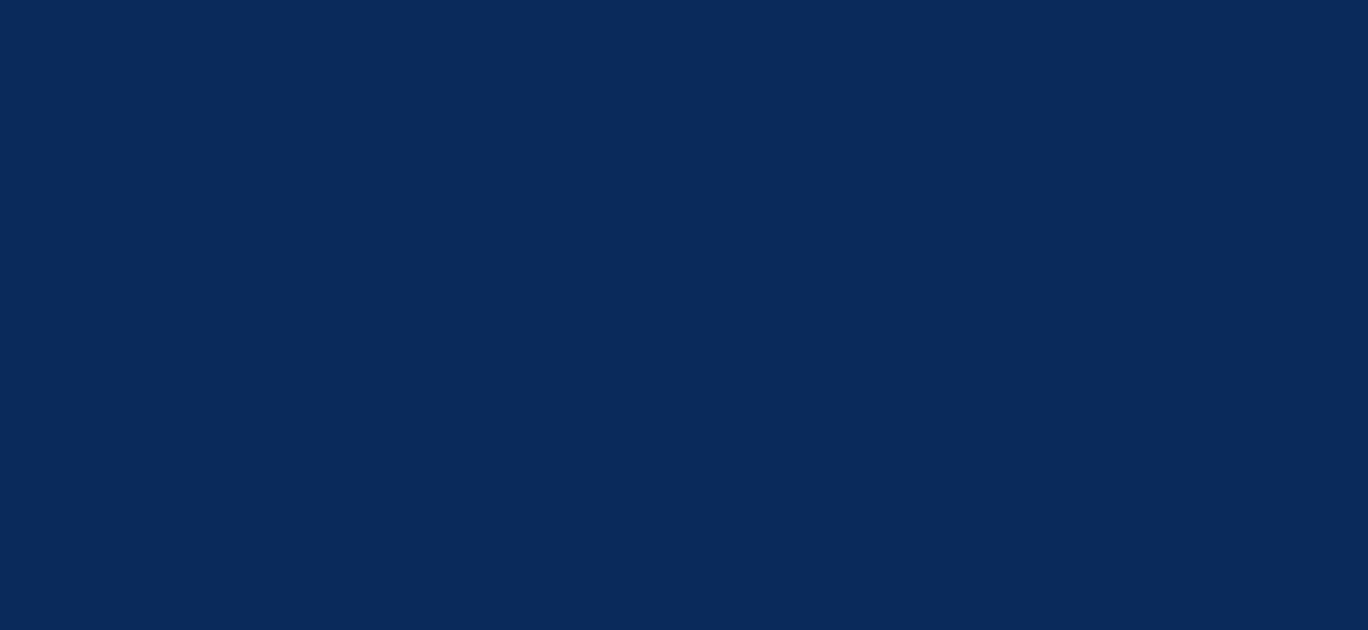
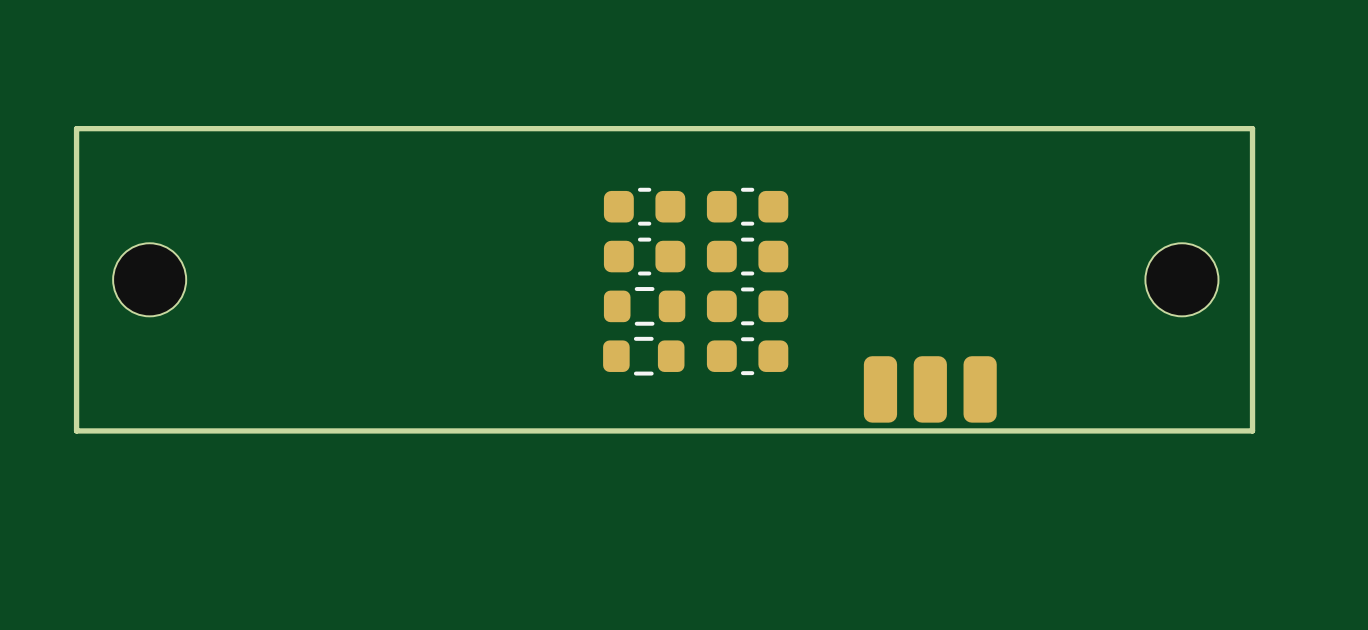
board edge: none -> (1252, 128) (76, 128) (76, 430) (1252, 430) (1252, 128)
part: none -> (644, 206)
part: none -> (747, 206)
part: none -> (644, 256)
part: none -> (747, 256)
part: none -> (149, 279)
part: none -> (1181, 279)
part: none -> (644, 306)
part: none -> (747, 306)
part: none -> (643, 356)
part: none -> (747, 356)
part: none -> (880, 389)
part: none -> (930, 389)
part: none -> (980, 389)

